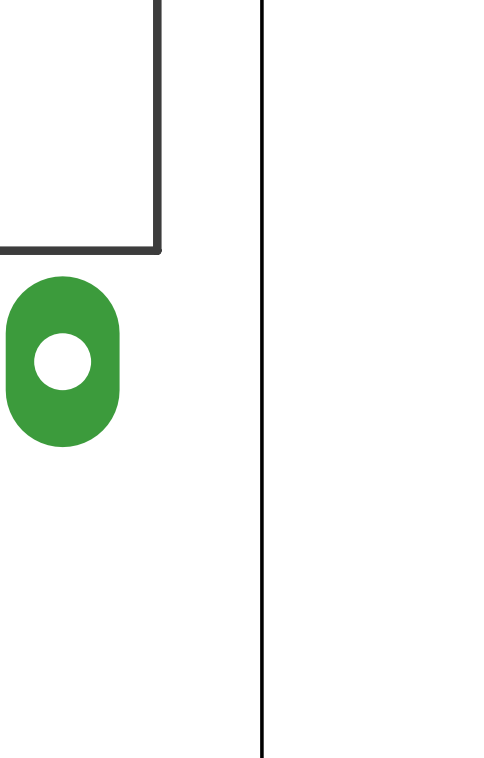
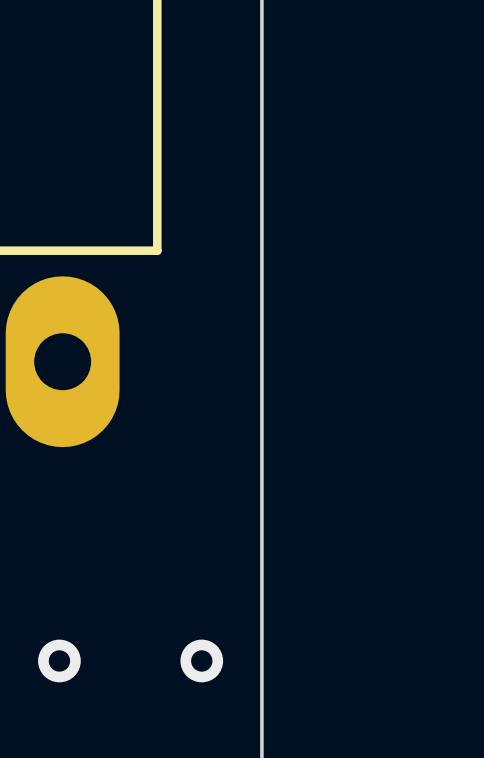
via: none -> (59, 660)
via: none -> (201, 660)

